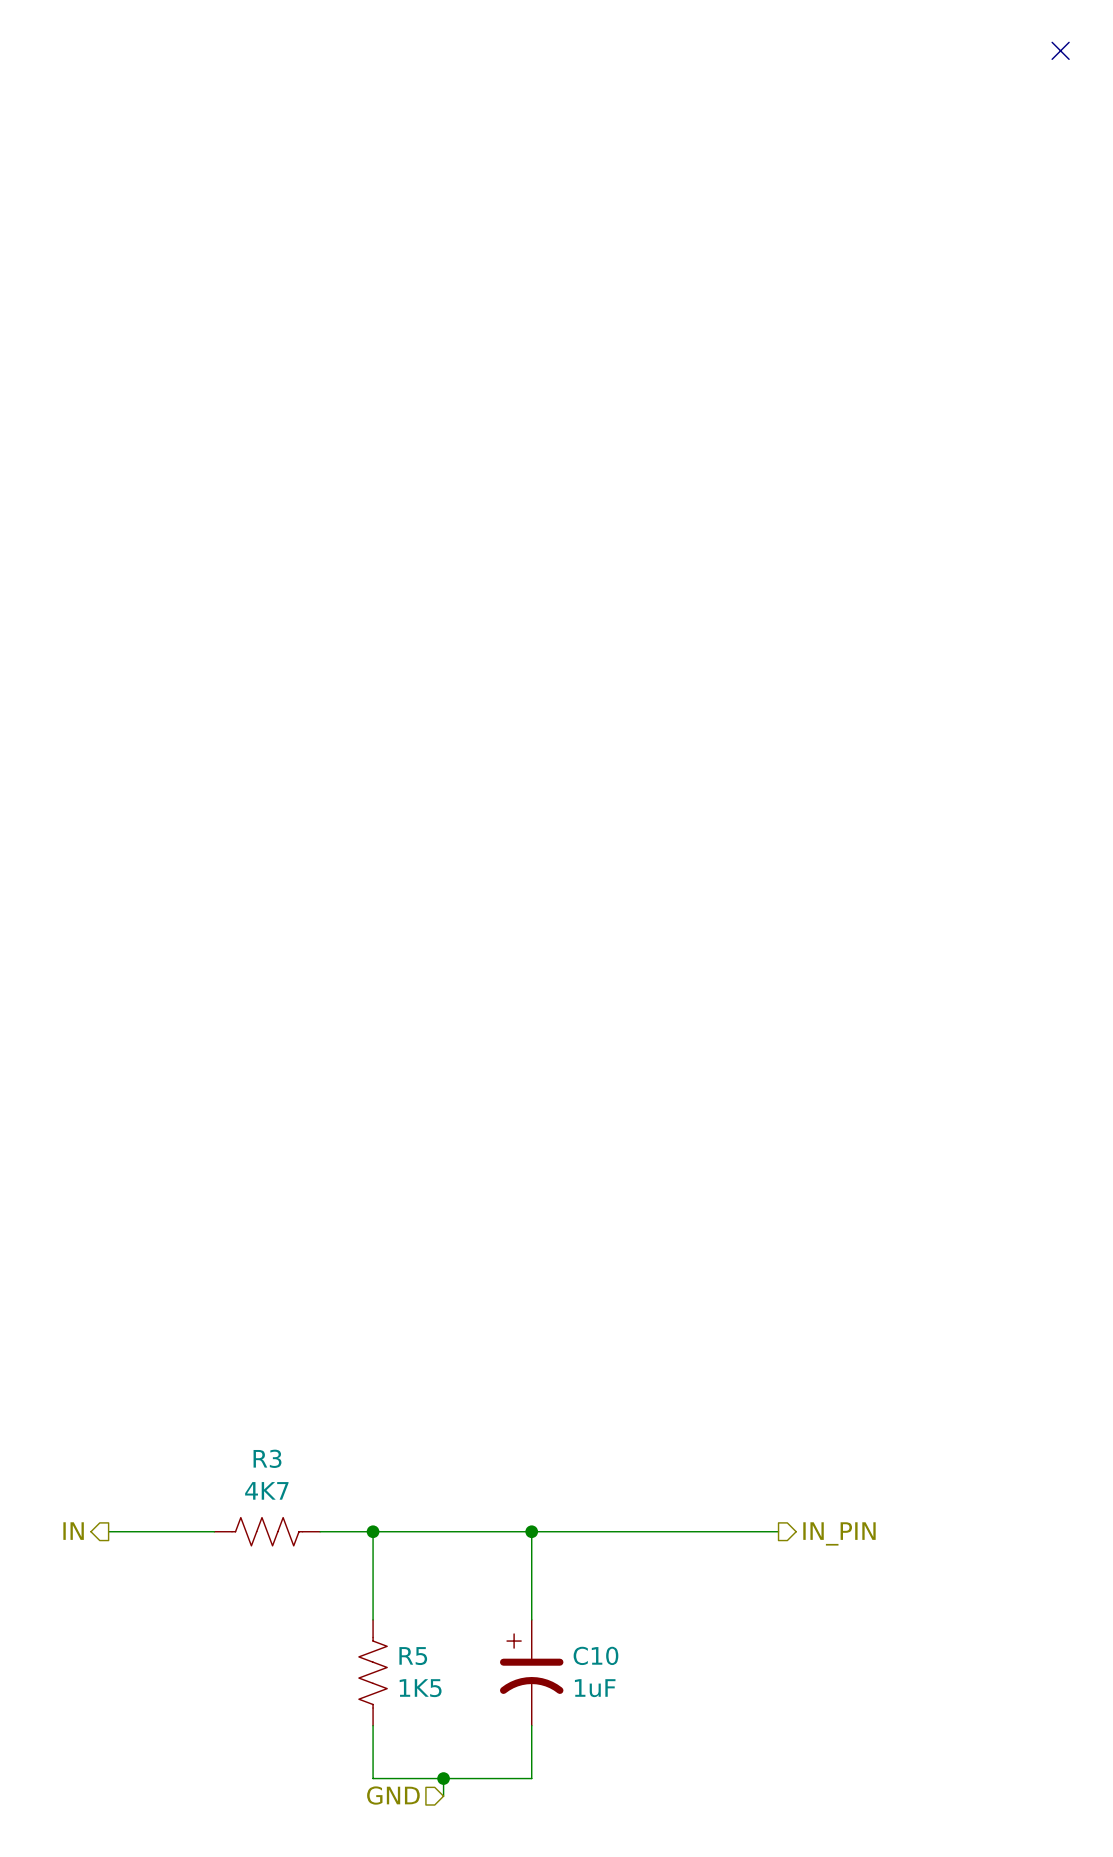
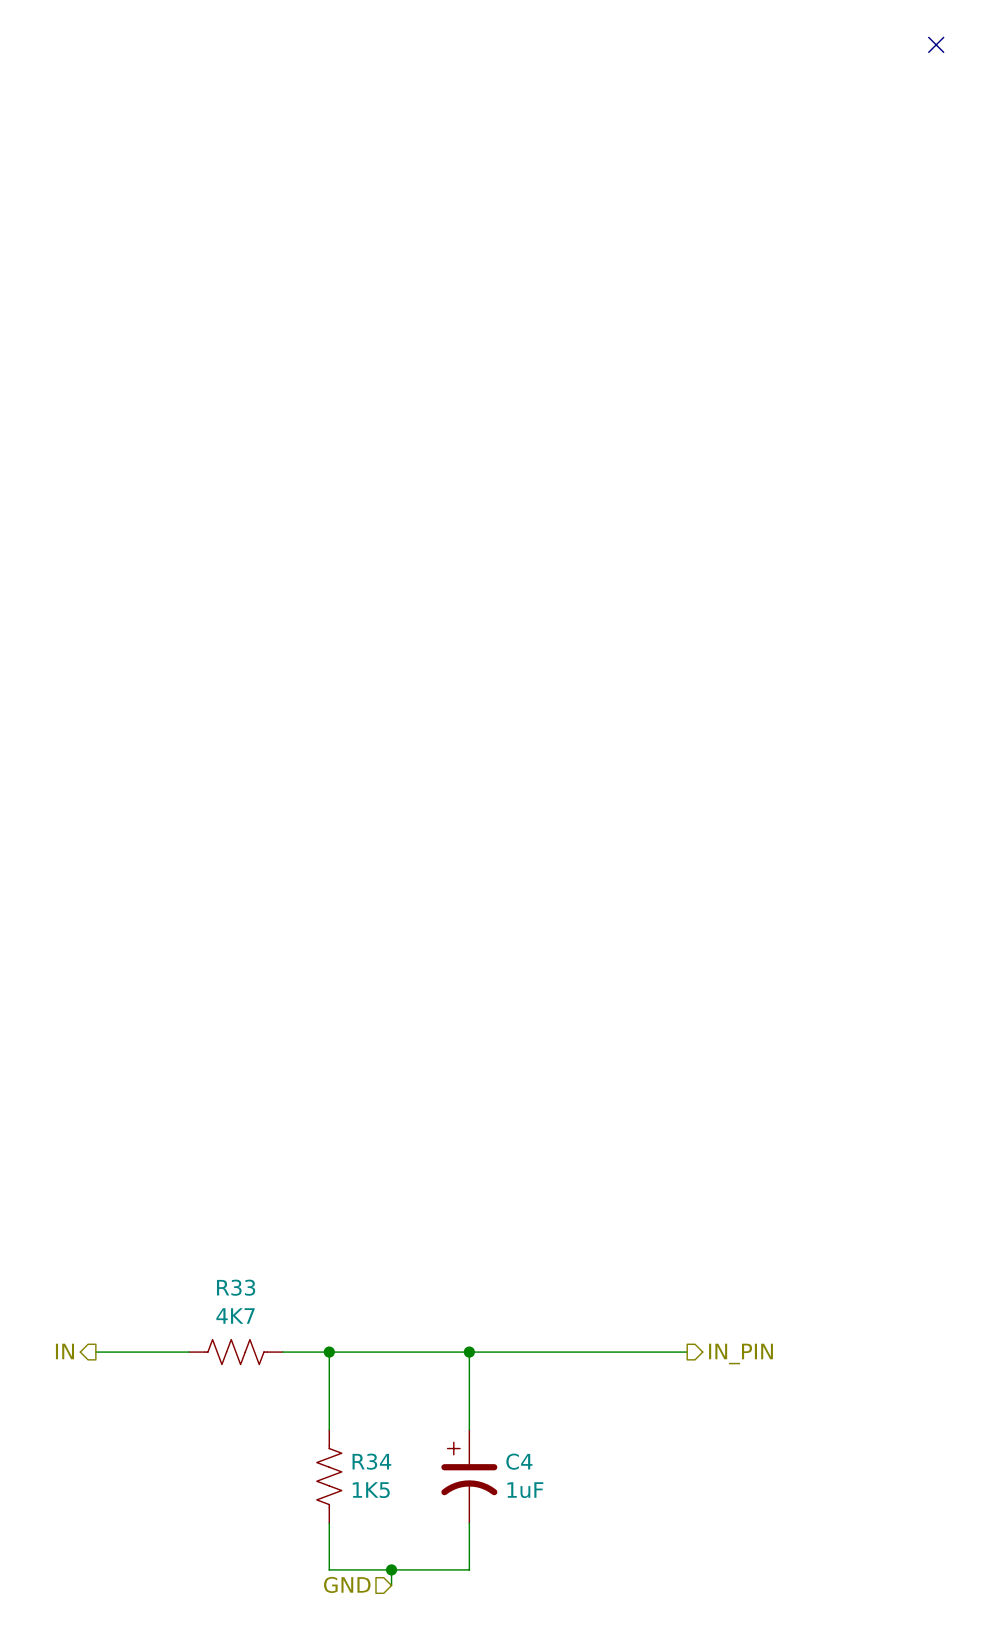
R3 name: R3 (267, 1458) -> R33 (236, 1287)
C10 name: C10 (595, 1655) -> C4 (519, 1461)
R5 name: R5 (413, 1656) -> R34 (371, 1461)

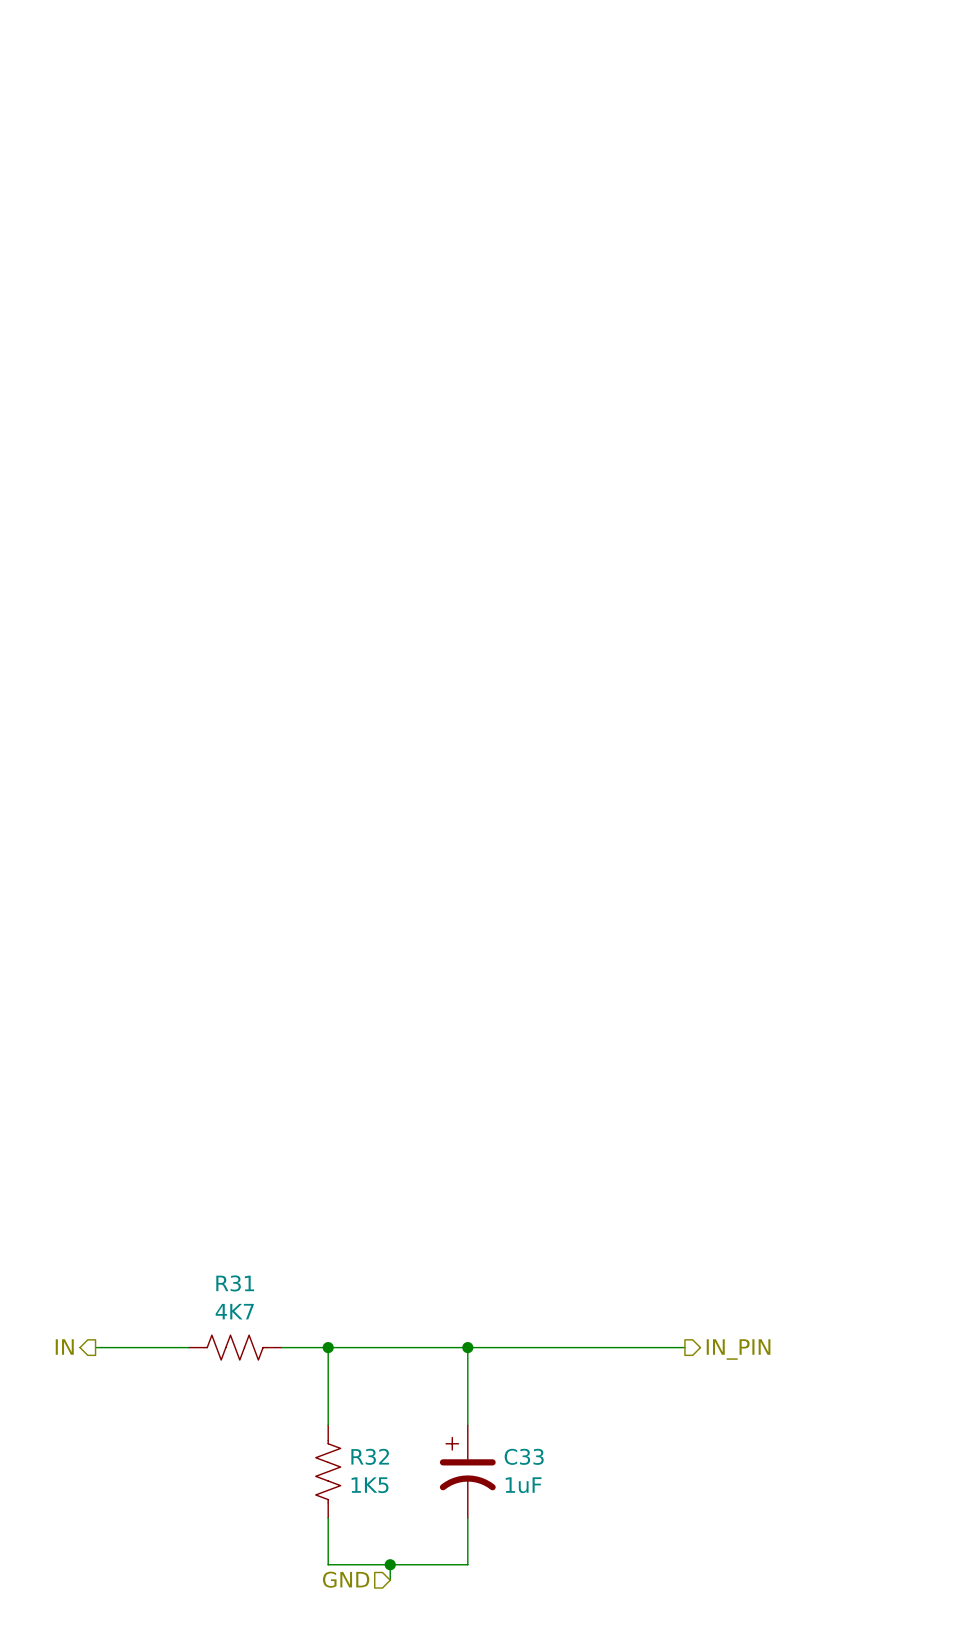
no-connect mark: (936, 44) -> none
R33 name: R33 (236, 1287) -> R31 (235, 1283)
R34 name: R34 (371, 1461) -> R32 (370, 1456)
C4 name: C4 (519, 1461) -> C33 (524, 1456)

